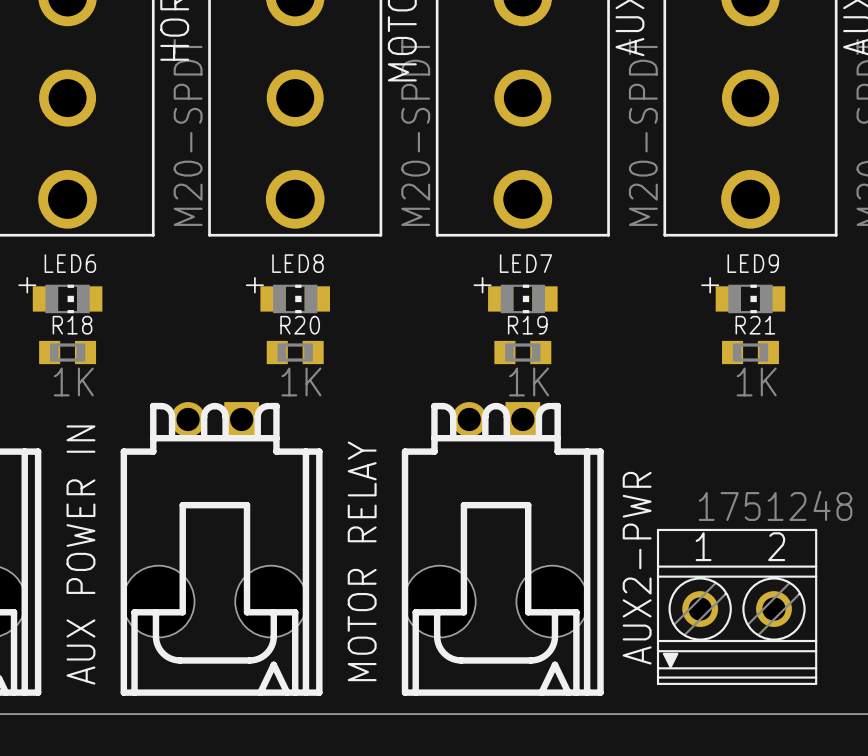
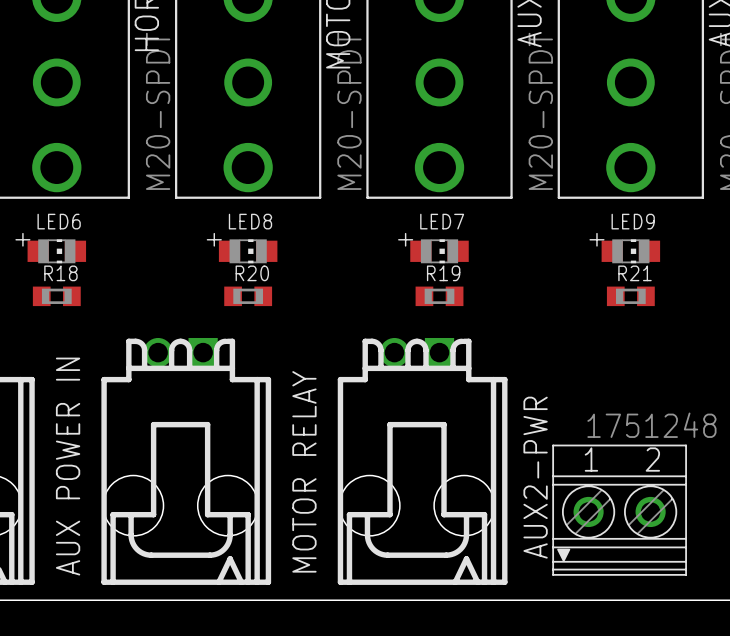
R18 value: 1K (73, 381) -> none
R20 value: 1K (301, 381) -> none
R19 value: 1K (529, 381) -> none
R21 value: 1K (756, 381) -> none

